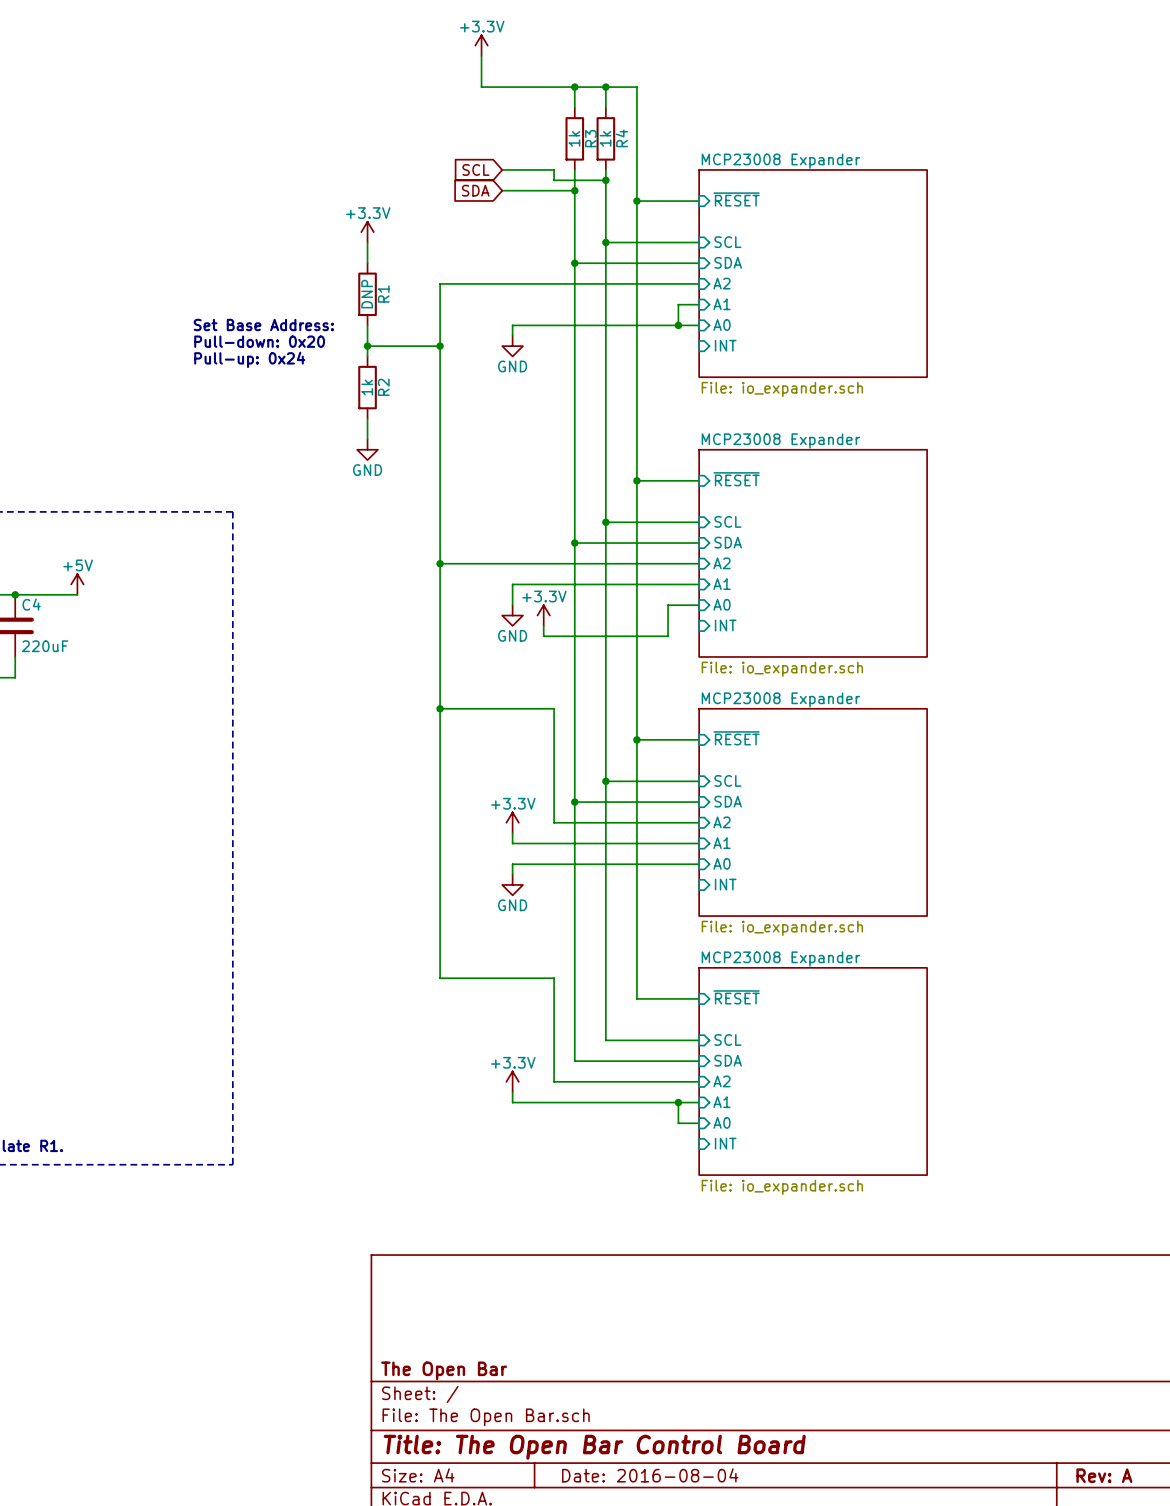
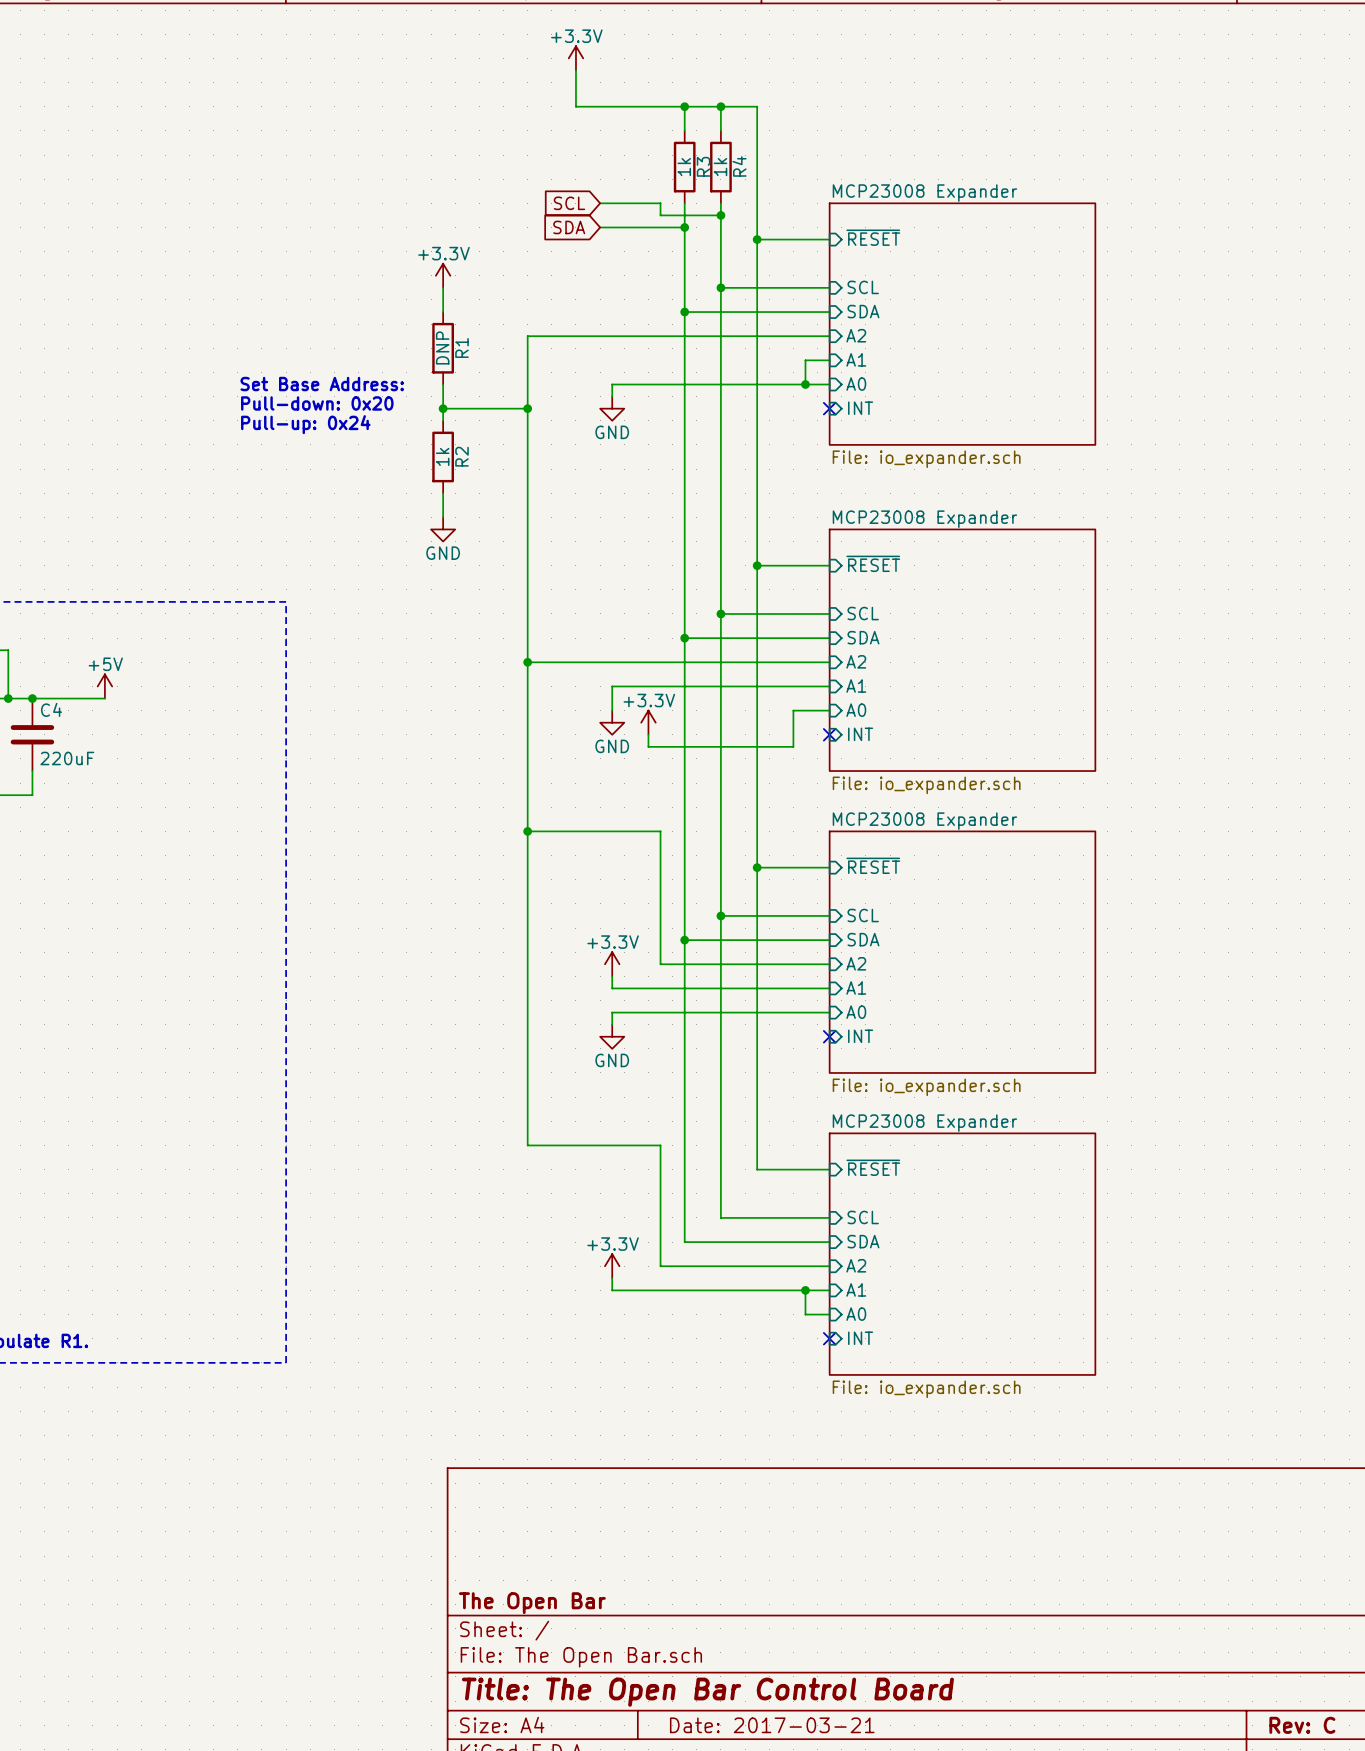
no-connect mark: none -> (829, 408)
no-connect mark: none -> (829, 734)
no-connect mark: none -> (829, 1036)
no-connect mark: none -> (829, 1338)
title block: Date: 2016-08-04 (650, 1475) -> Date: 2017-03-21 (772, 1725)
title block: Rev: A (1104, 1475) -> Rev: C (1302, 1725)

